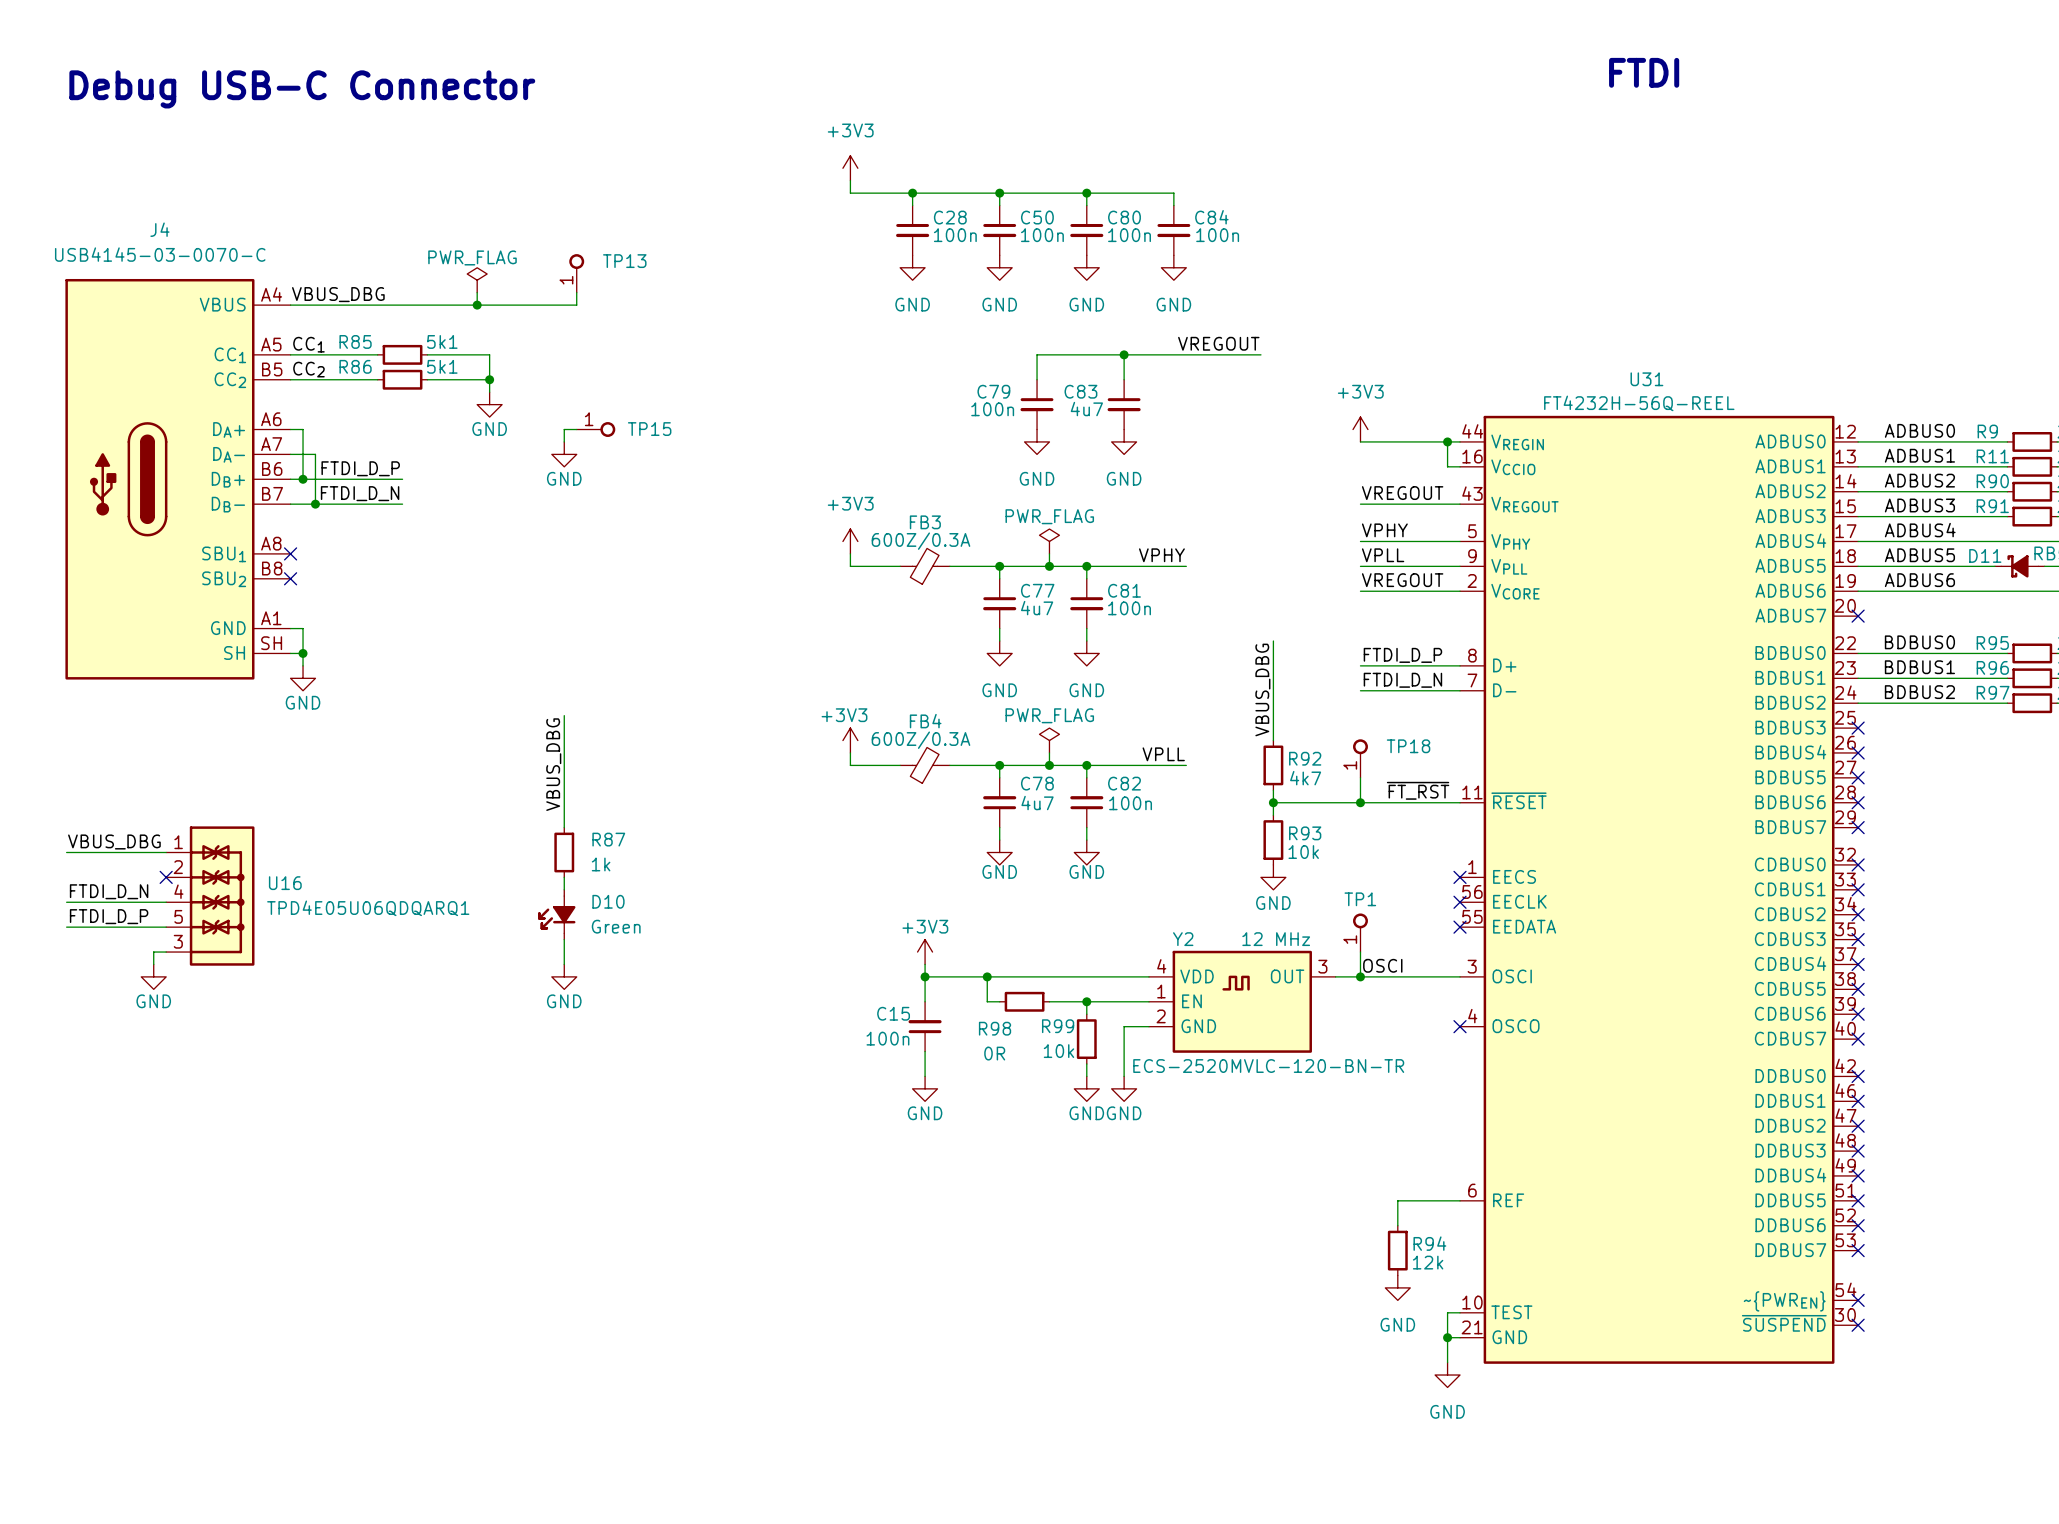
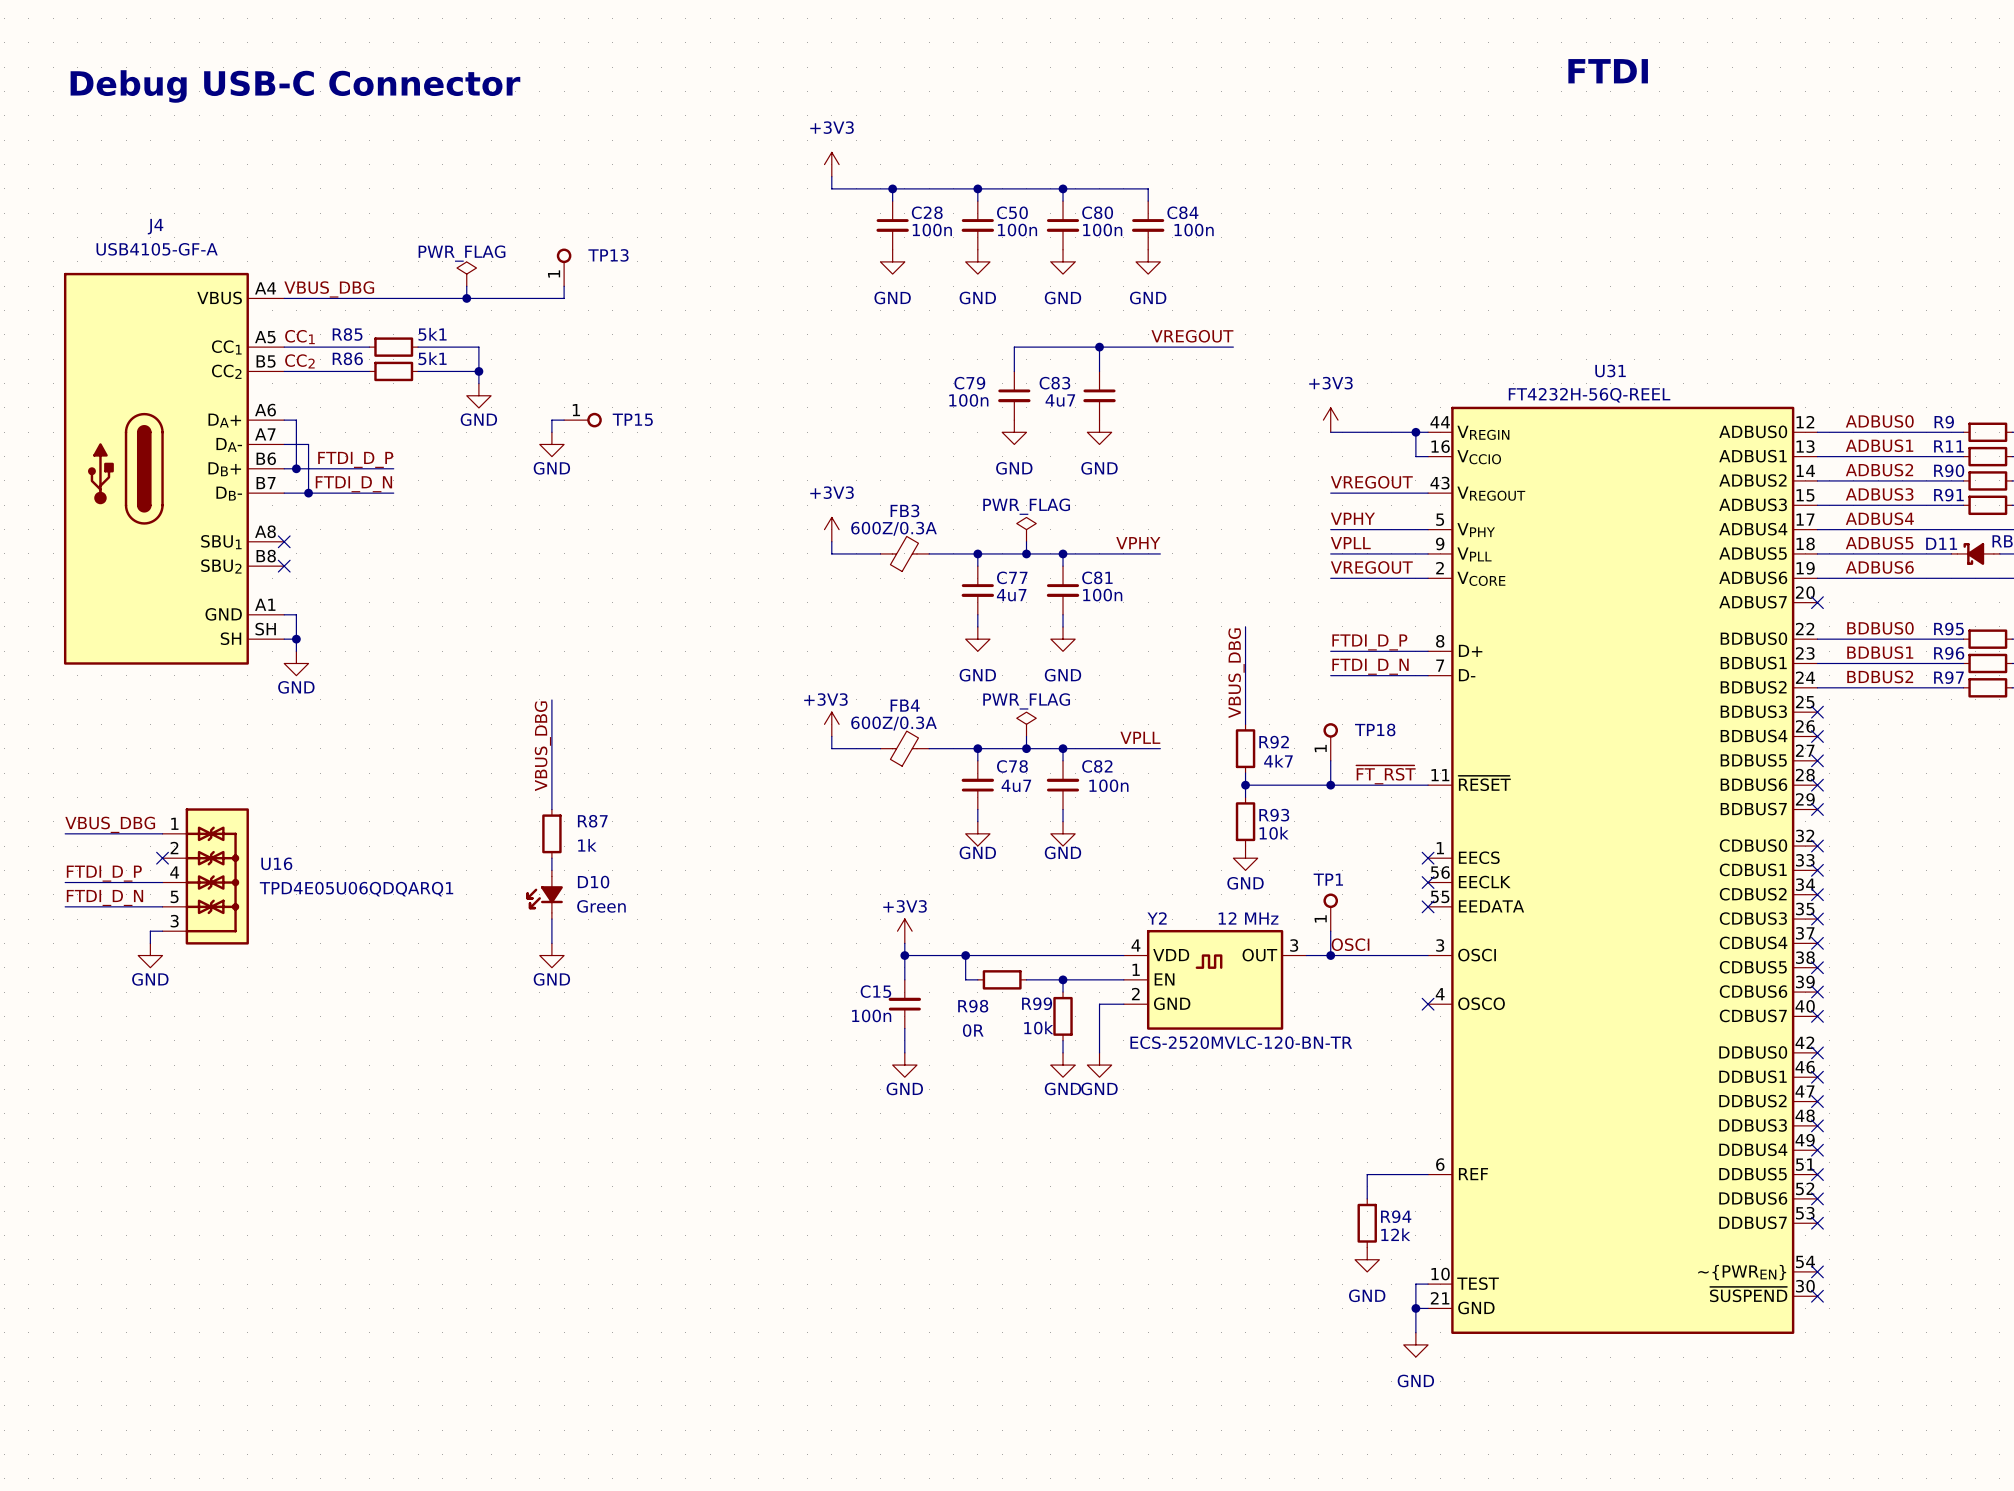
J4 text: USB4145-03-0070-C (160, 254) -> USB4105-GF-A (157, 249)
label: FTDI_D_N (109, 891) -> FTDI_D_P (104, 873)
label: FTDI_D_P (109, 916) -> FTDI_D_N (104, 897)

